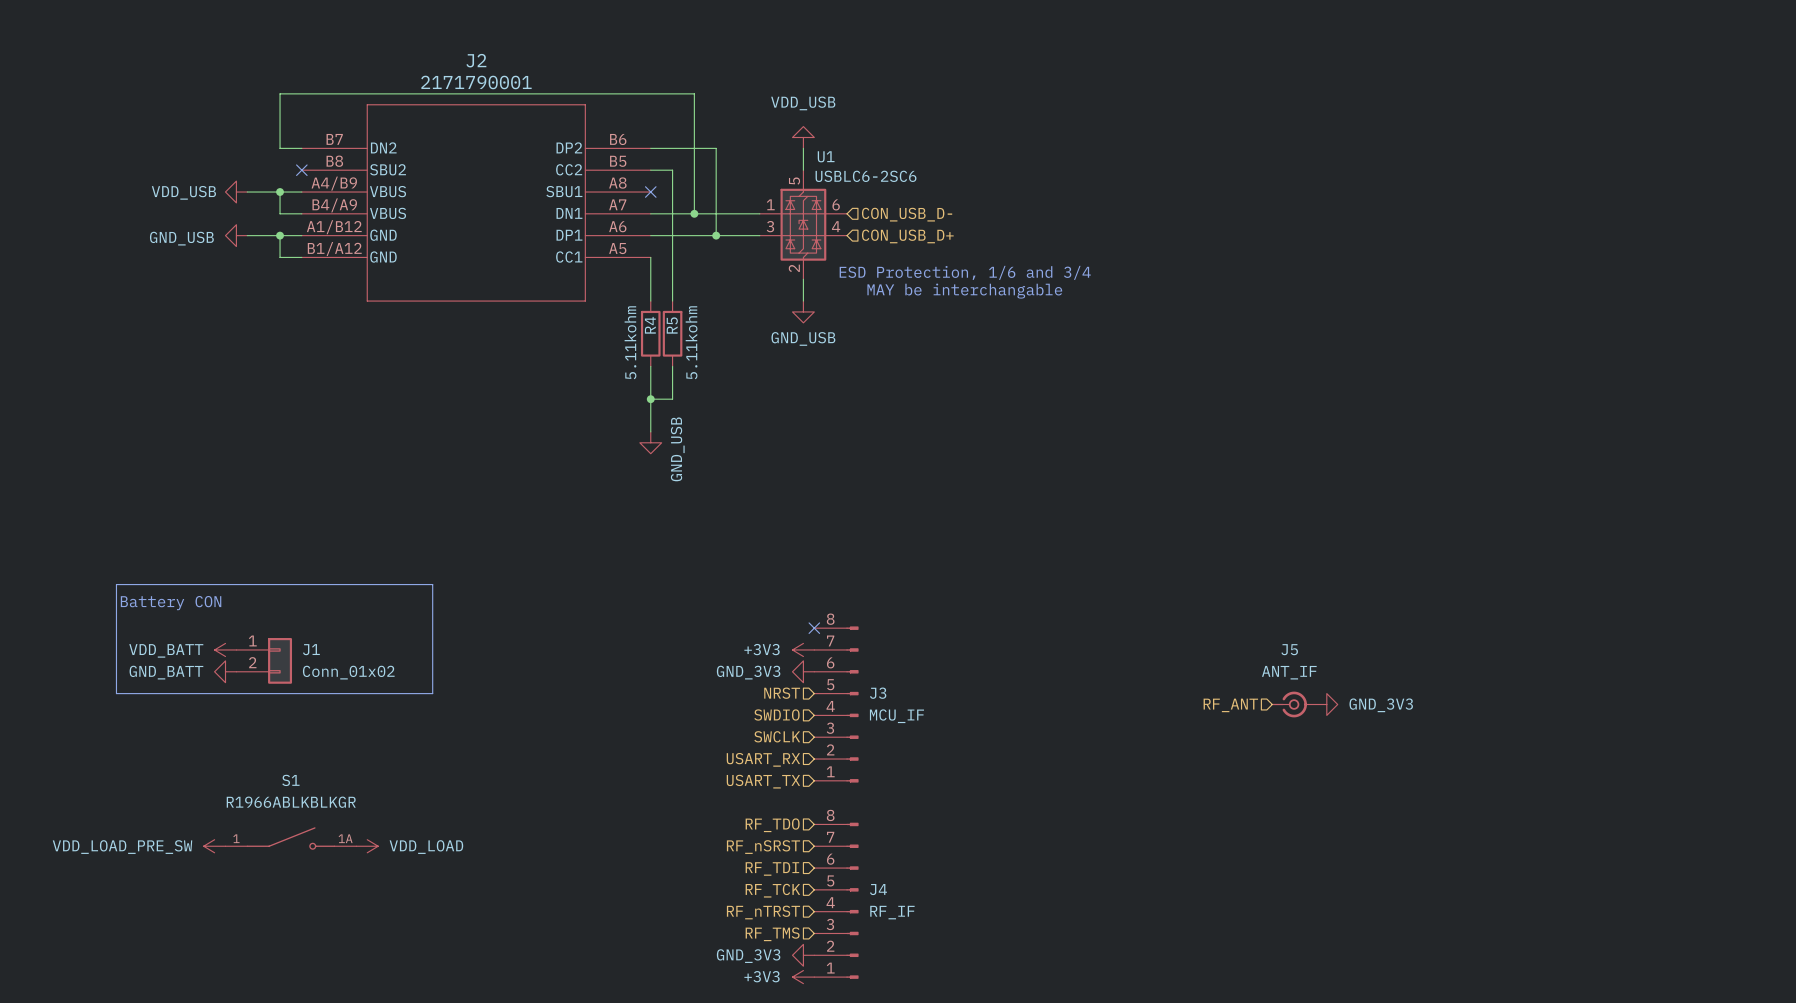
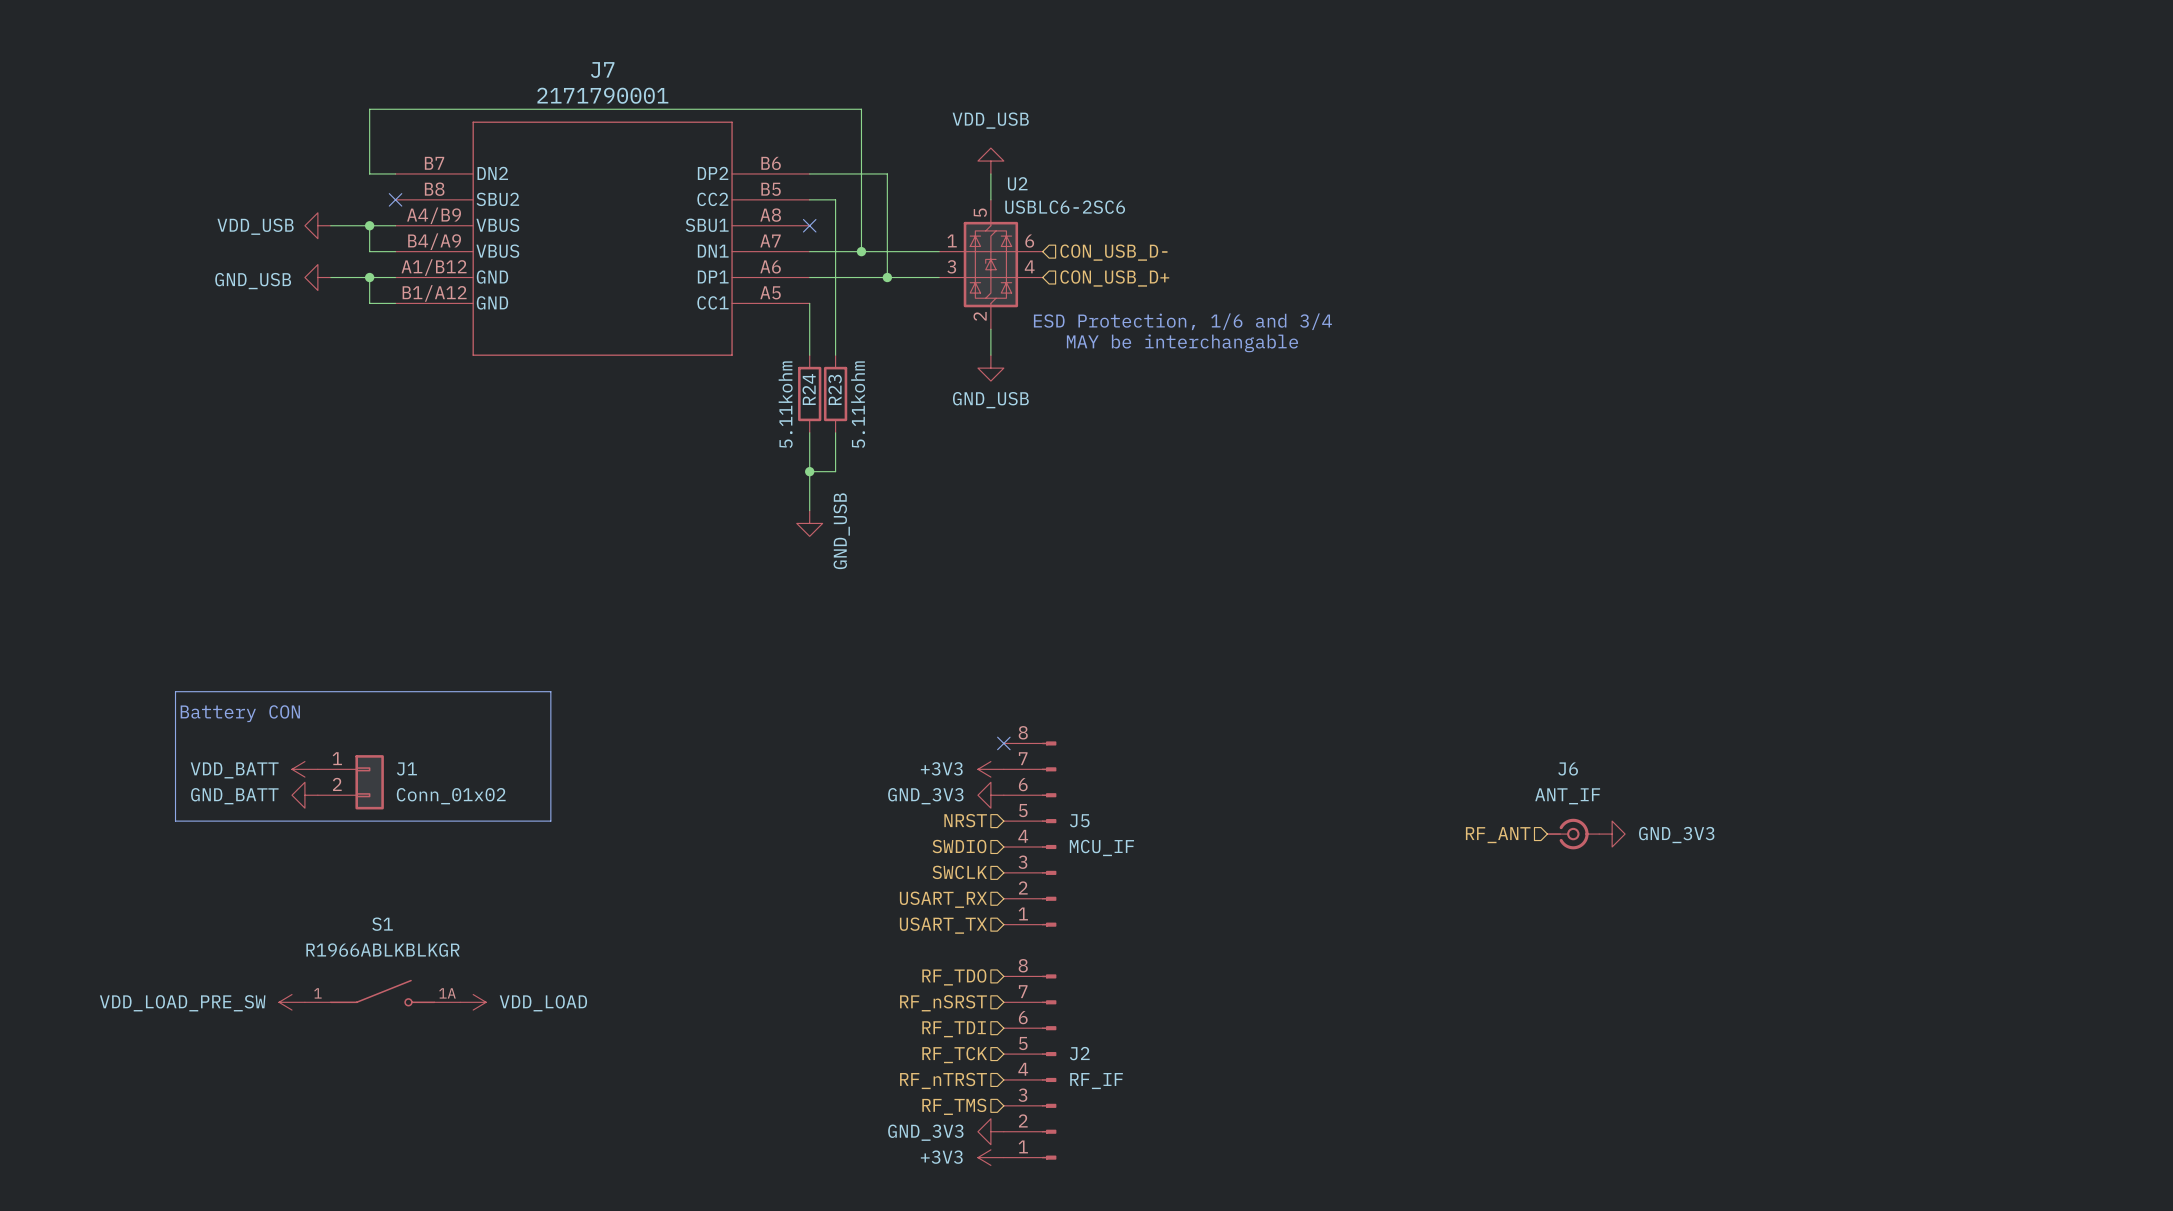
J2 name: J2 (476, 60) -> J7 (602, 69)
U1 name: U1 (826, 156) -> U2 (1017, 183)
R4 name: R4 (650, 325) -> R24 (809, 389)
R5 name: R5 (672, 325) -> R23 (835, 389)
J5 name: J5 (1289, 649) -> J6 (1568, 768)
J3 name: J3 (878, 693) -> J5 (1079, 820)
J4 name: J4 (878, 889) -> J2 (1079, 1053)

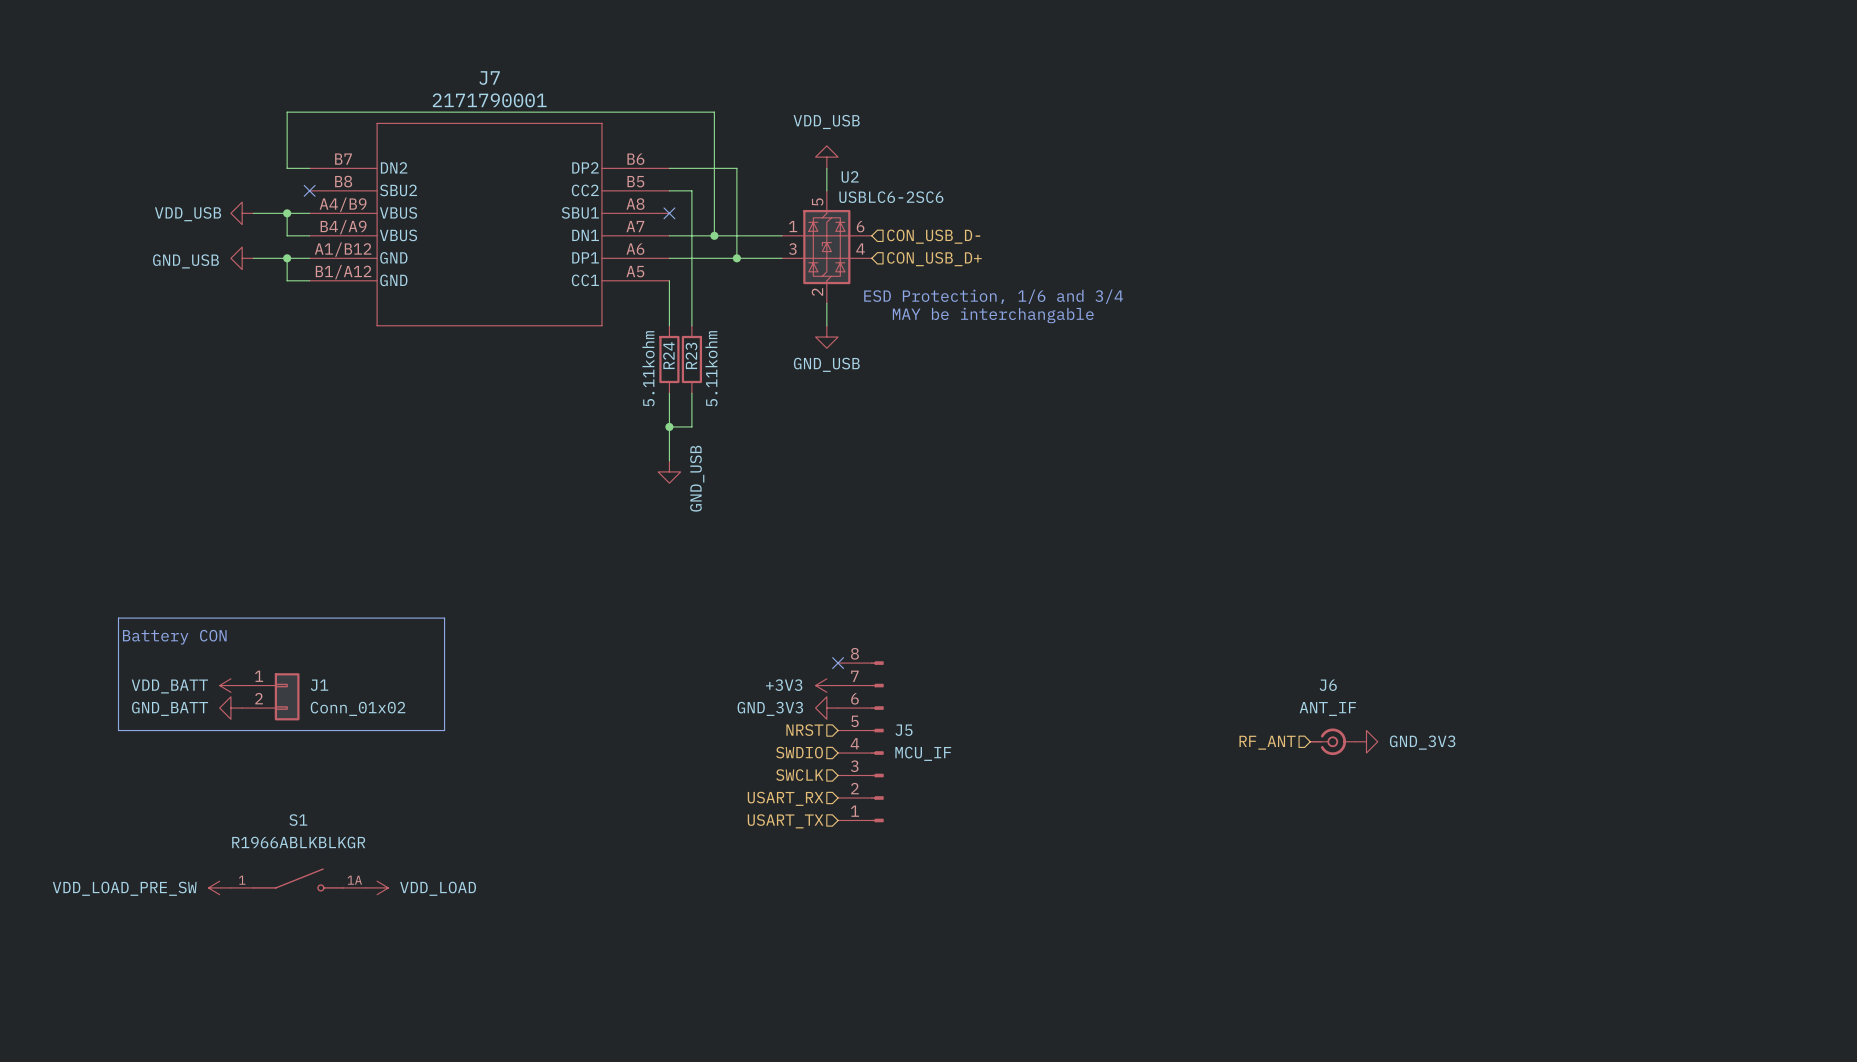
hierarchical label: RF_TDO (954, 977) -> none
hierarchical label: RF_nSRST (943, 1003) -> none
hierarchical label: RF_TDI (954, 1029) -> none
hierarchical label: RF_TCK (954, 1055) -> none
J2: RF_IF (1030, 1067) -> none
hierarchical label: RF_nTRST (943, 1080) -> none
hierarchical label: RF_TMS (954, 1106) -> none
power symbol: GND_3V3 (990, 1131) -> none
power symbol: +3V3 (990, 1157) -> none

